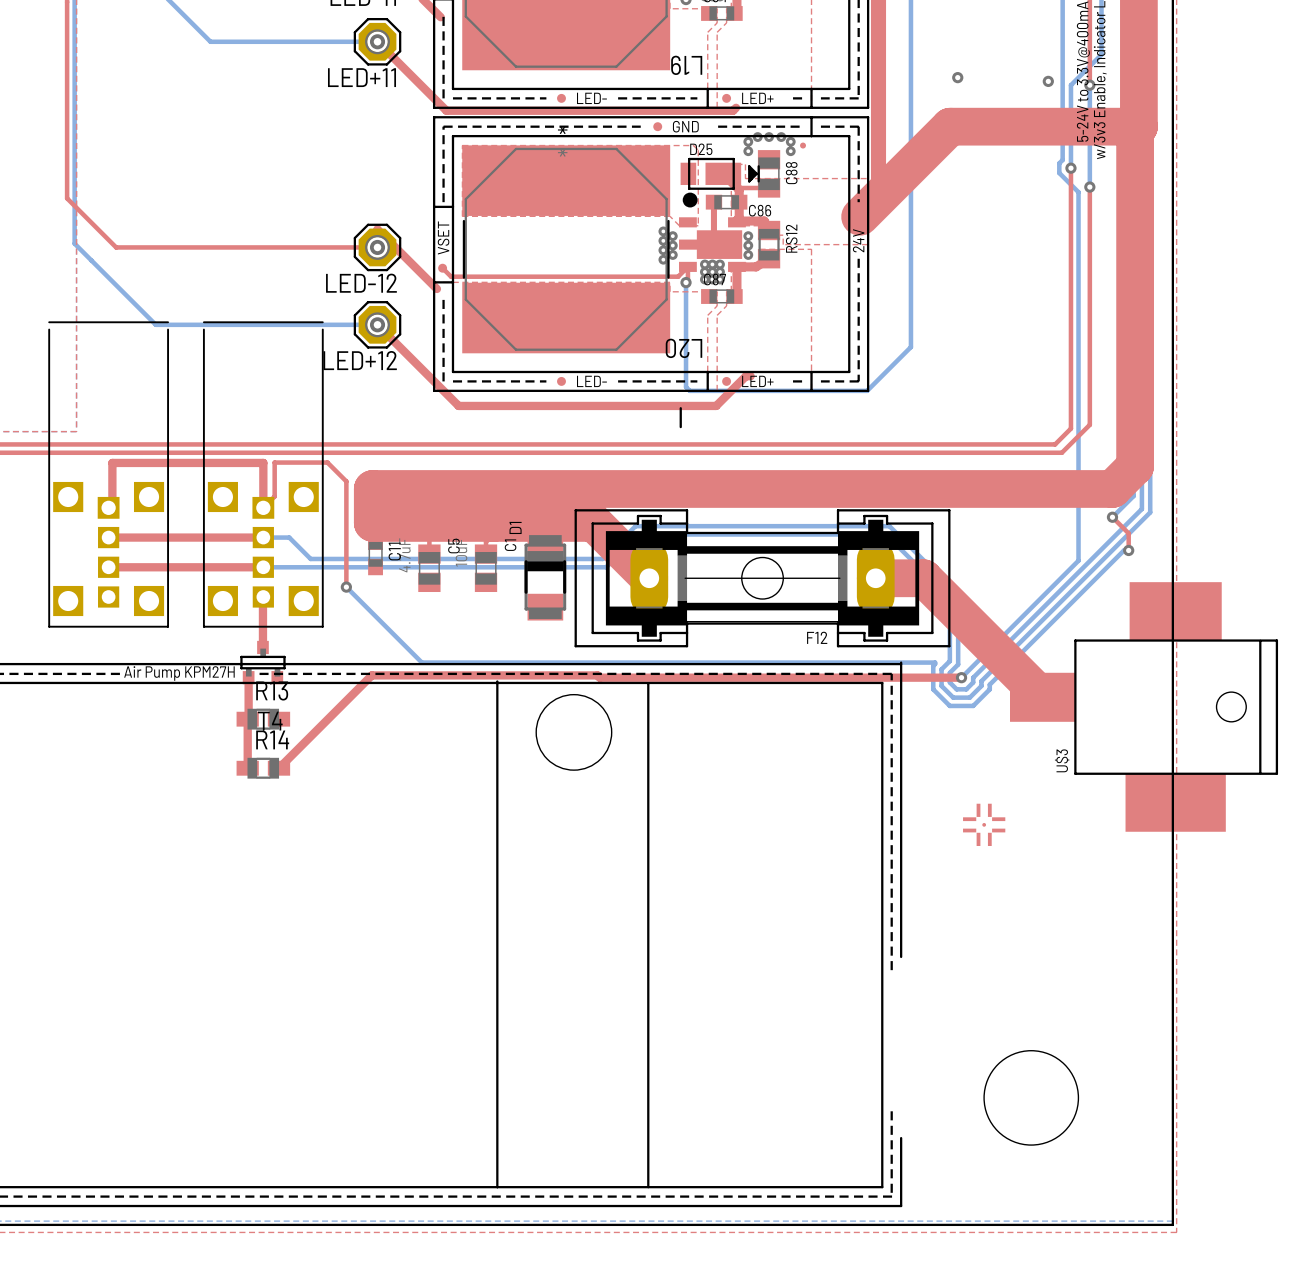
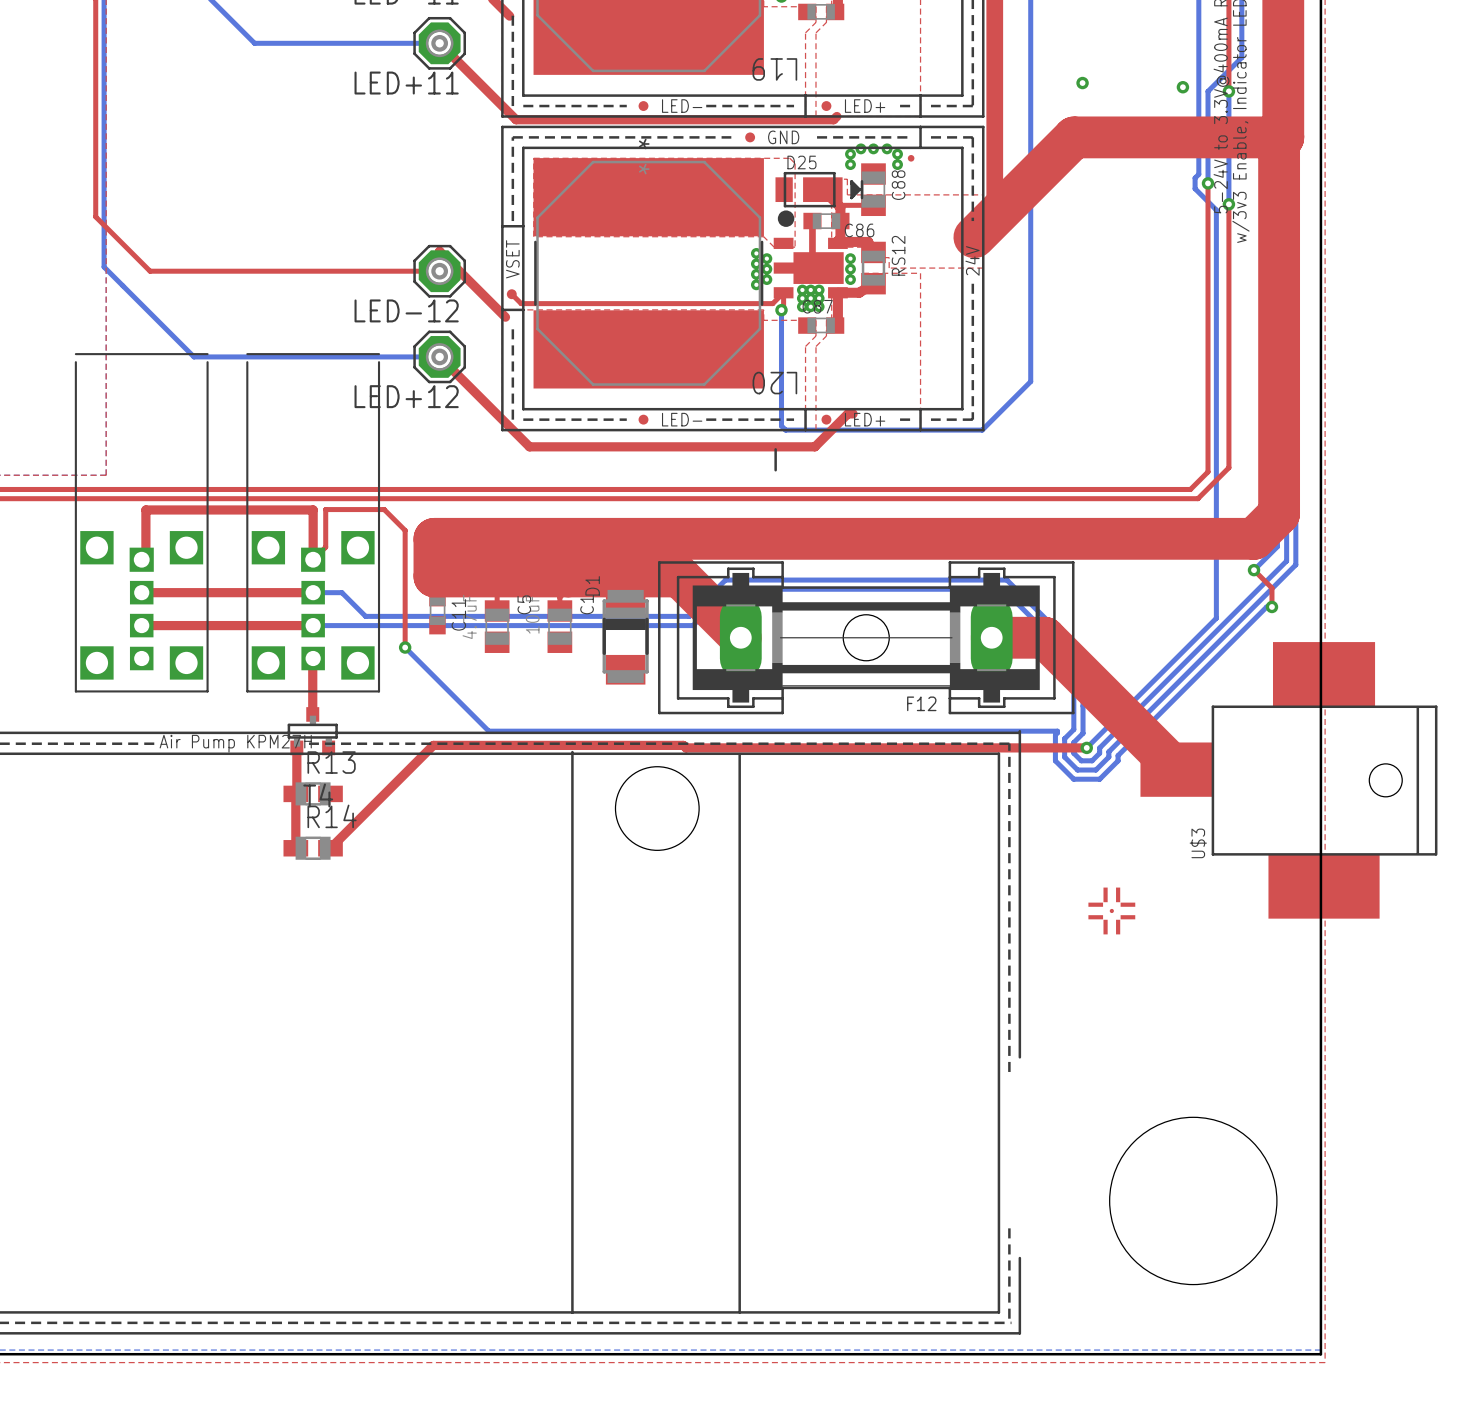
round board edge: none -> [1109, 1117, 1278, 1285]
round board edge: [983, 1050, 1079, 1146] -> none

